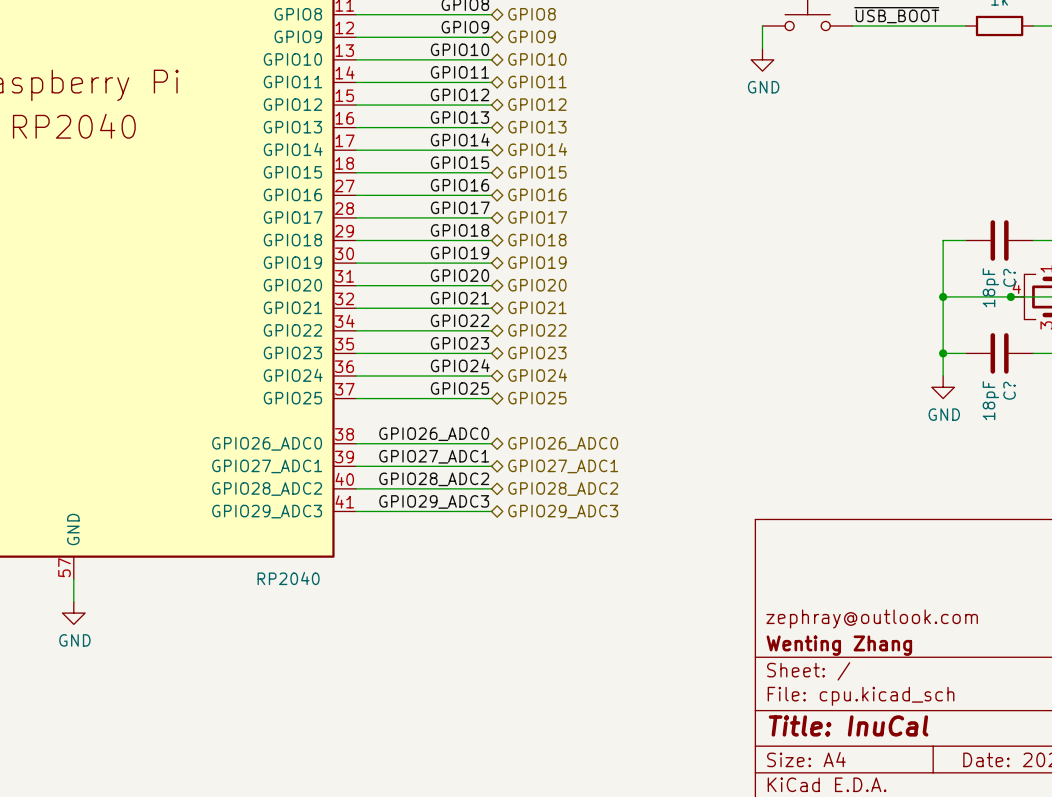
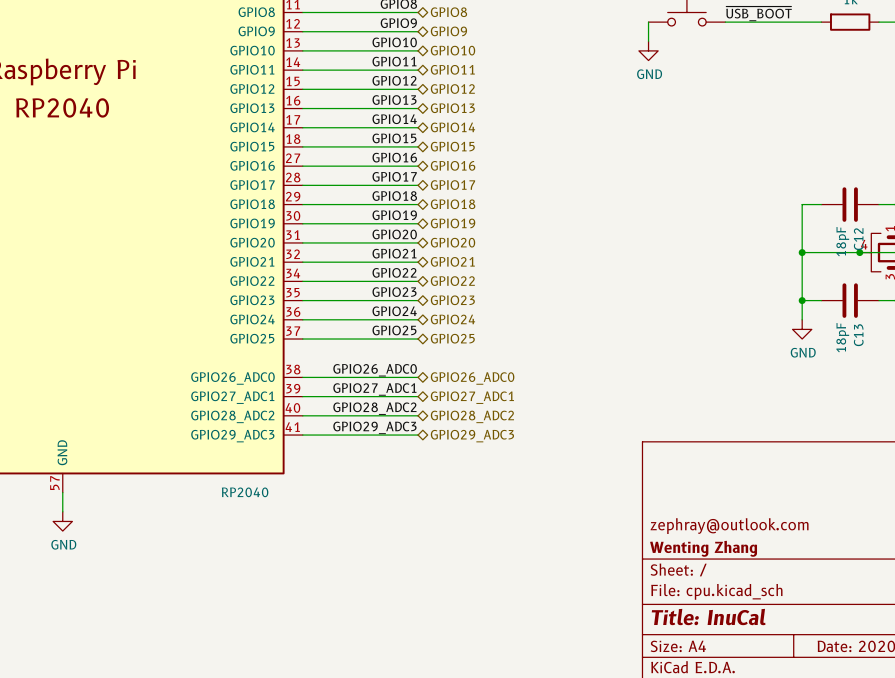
C? name: C? (1009, 277) -> C12 (858, 239)
C? name: C? (1009, 390) -> C13 (858, 335)

